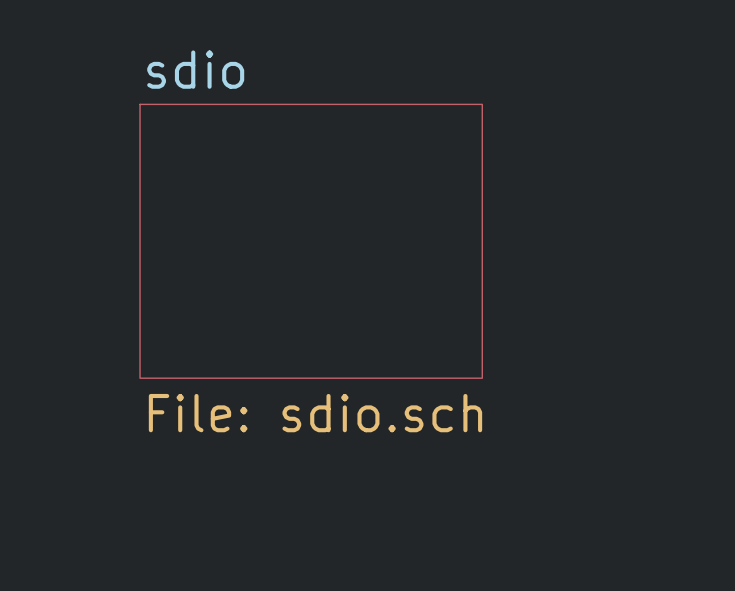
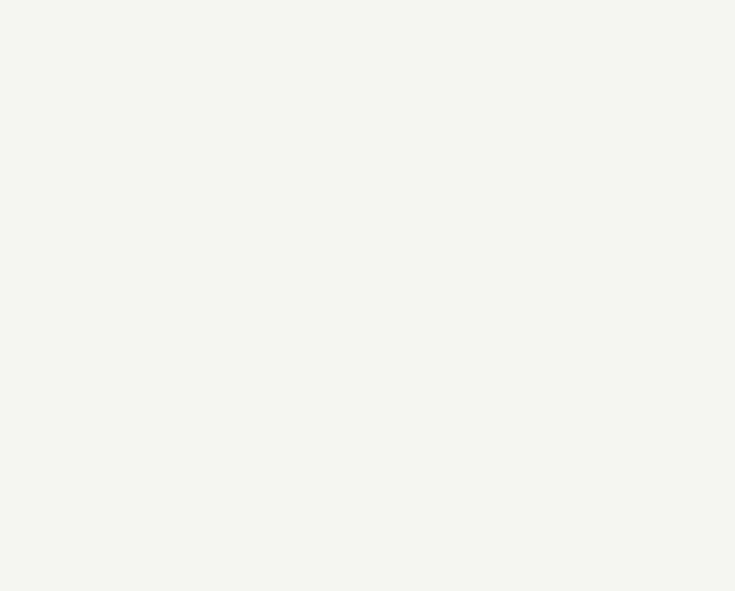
sheet sdio: File: sdio.sch (311, 241) -> none

